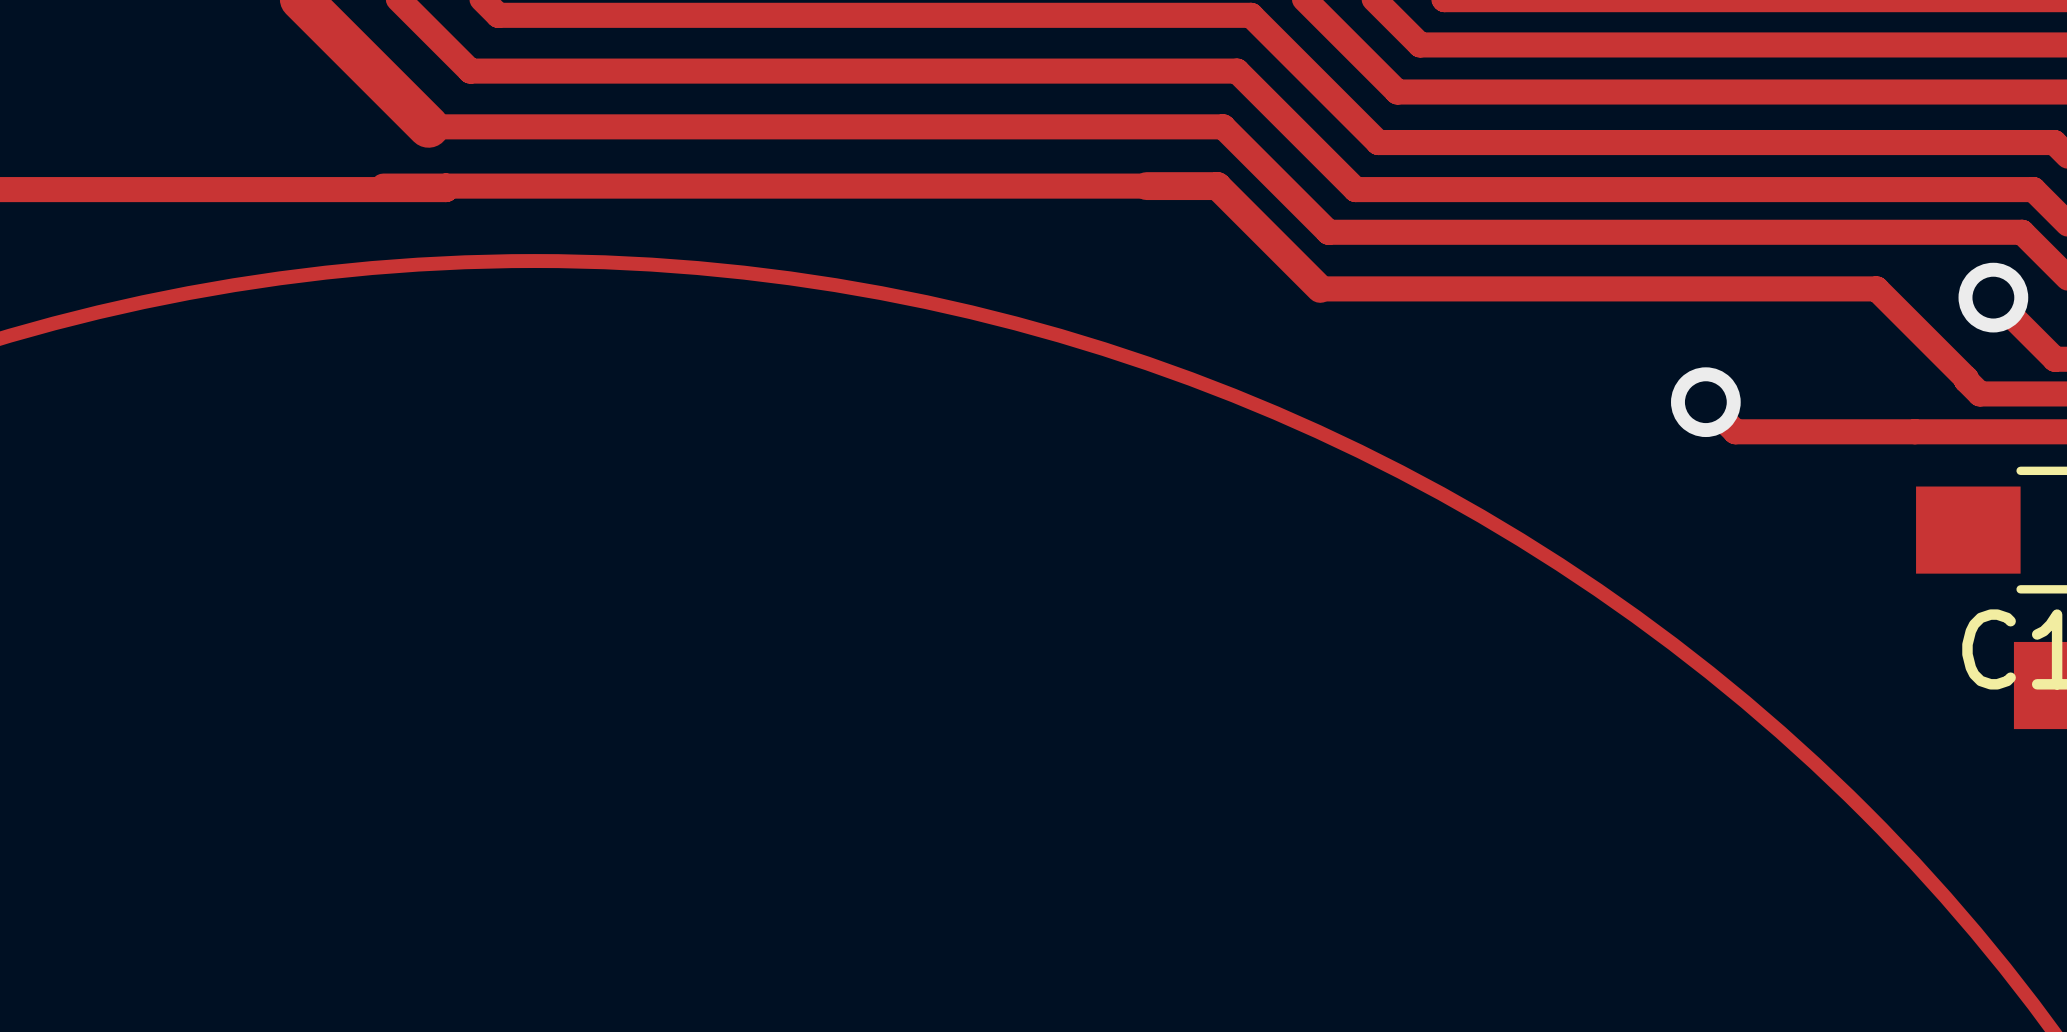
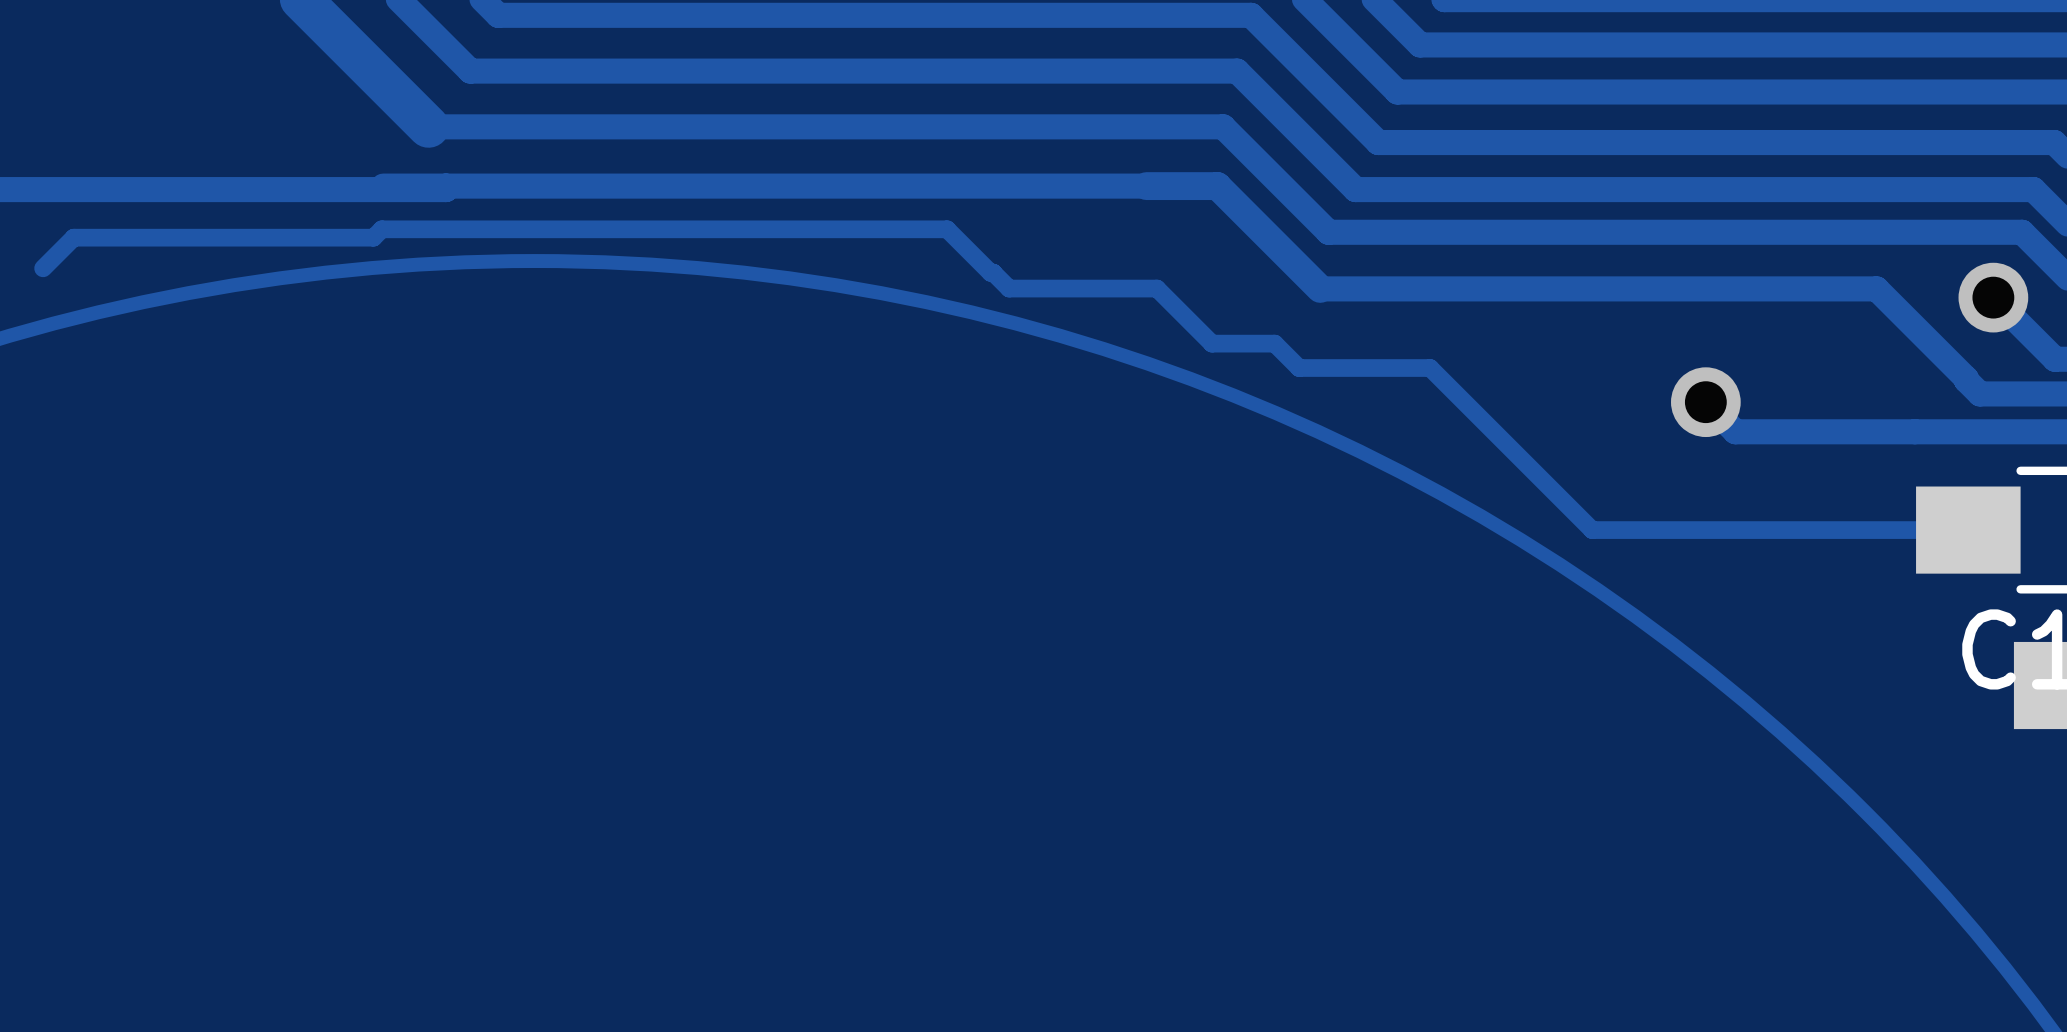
track: none -> (43, 268) (73, 237) (373, 237) (381, 229) (947, 229) (990, 272) (993, 272)
track: none -> (993, 272) (1009, 288) (1156, 288) (1212, 343) (1274, 343) (1299, 368) (1430, 368) (1592, 530) (1968, 530)

